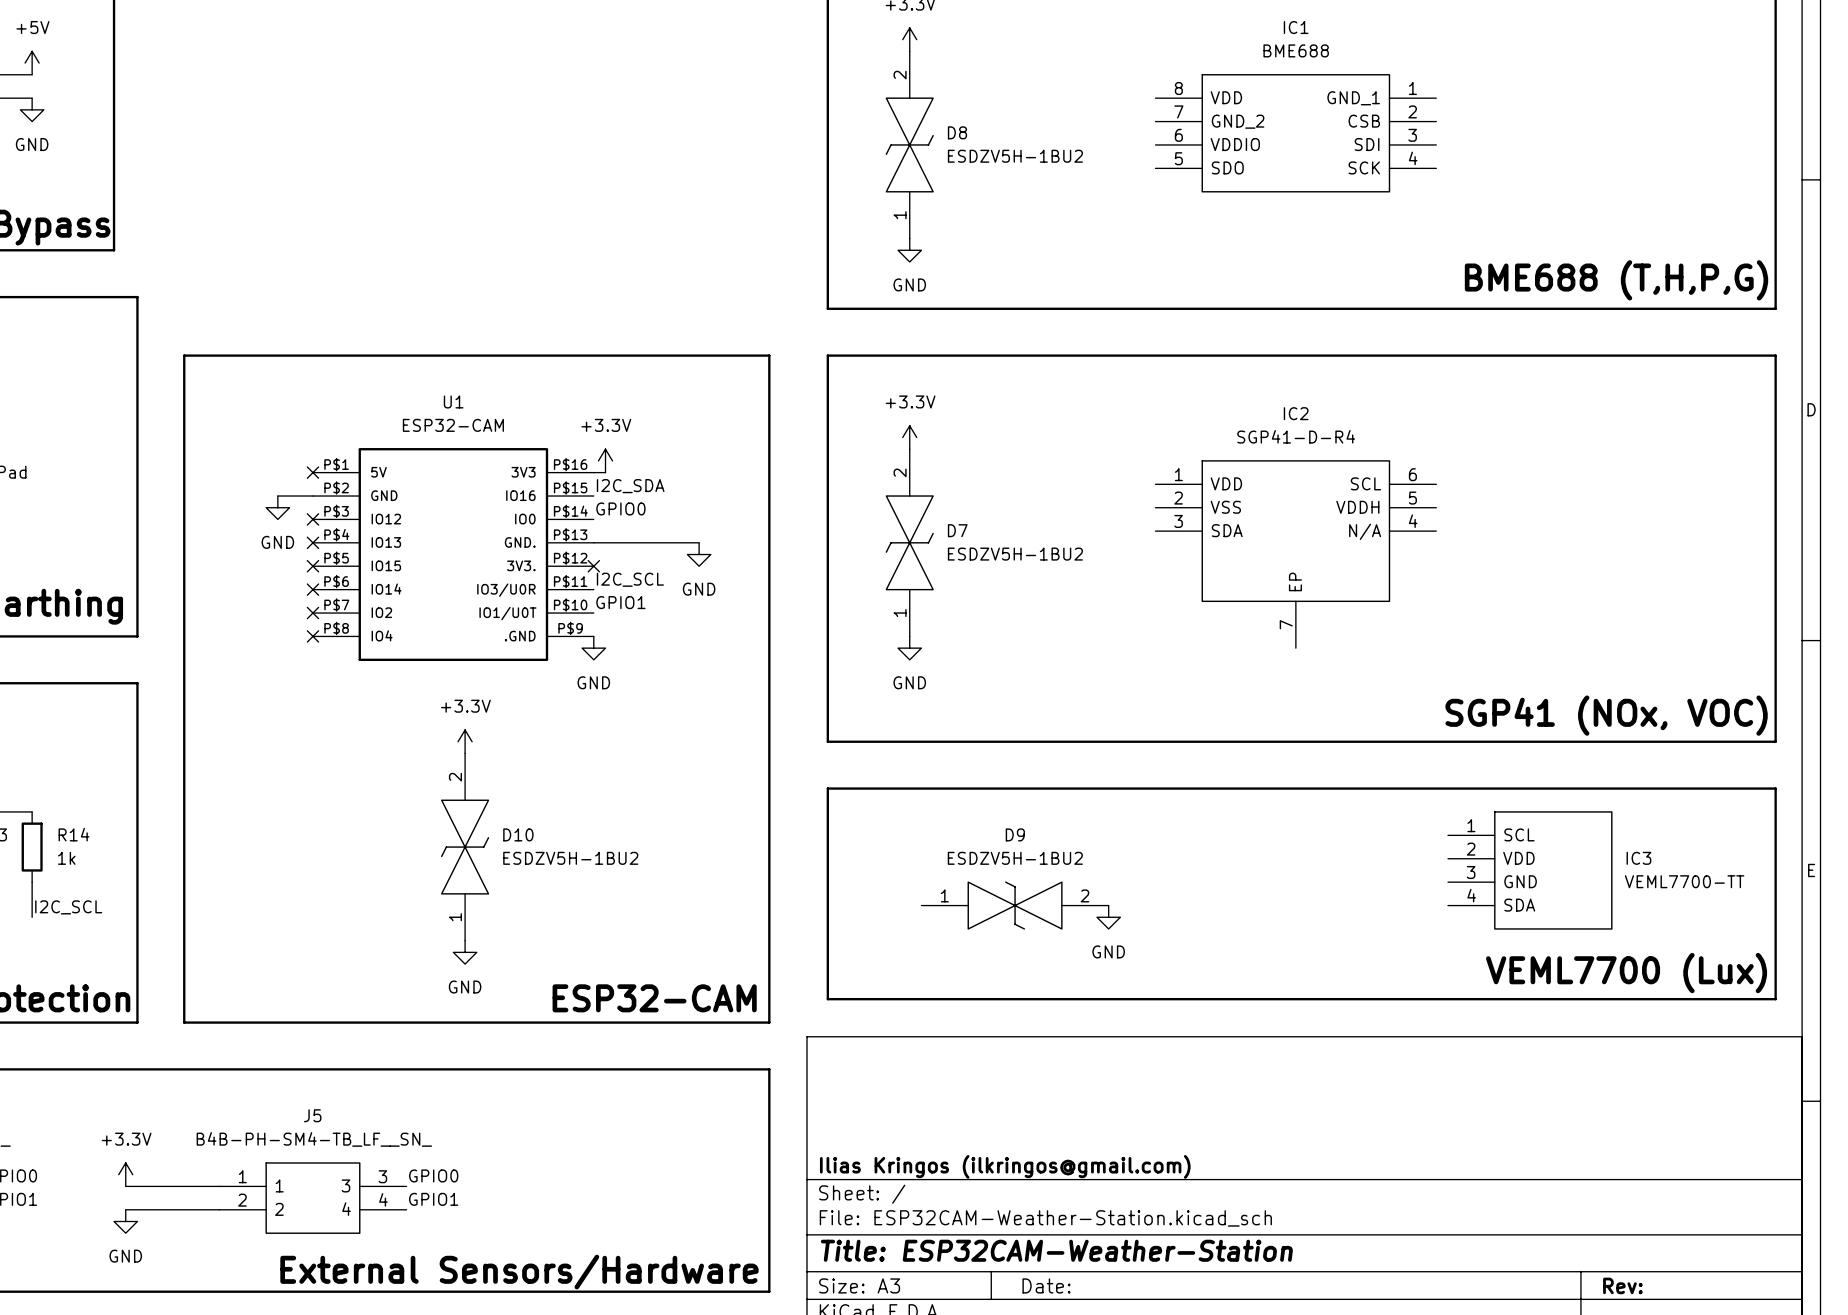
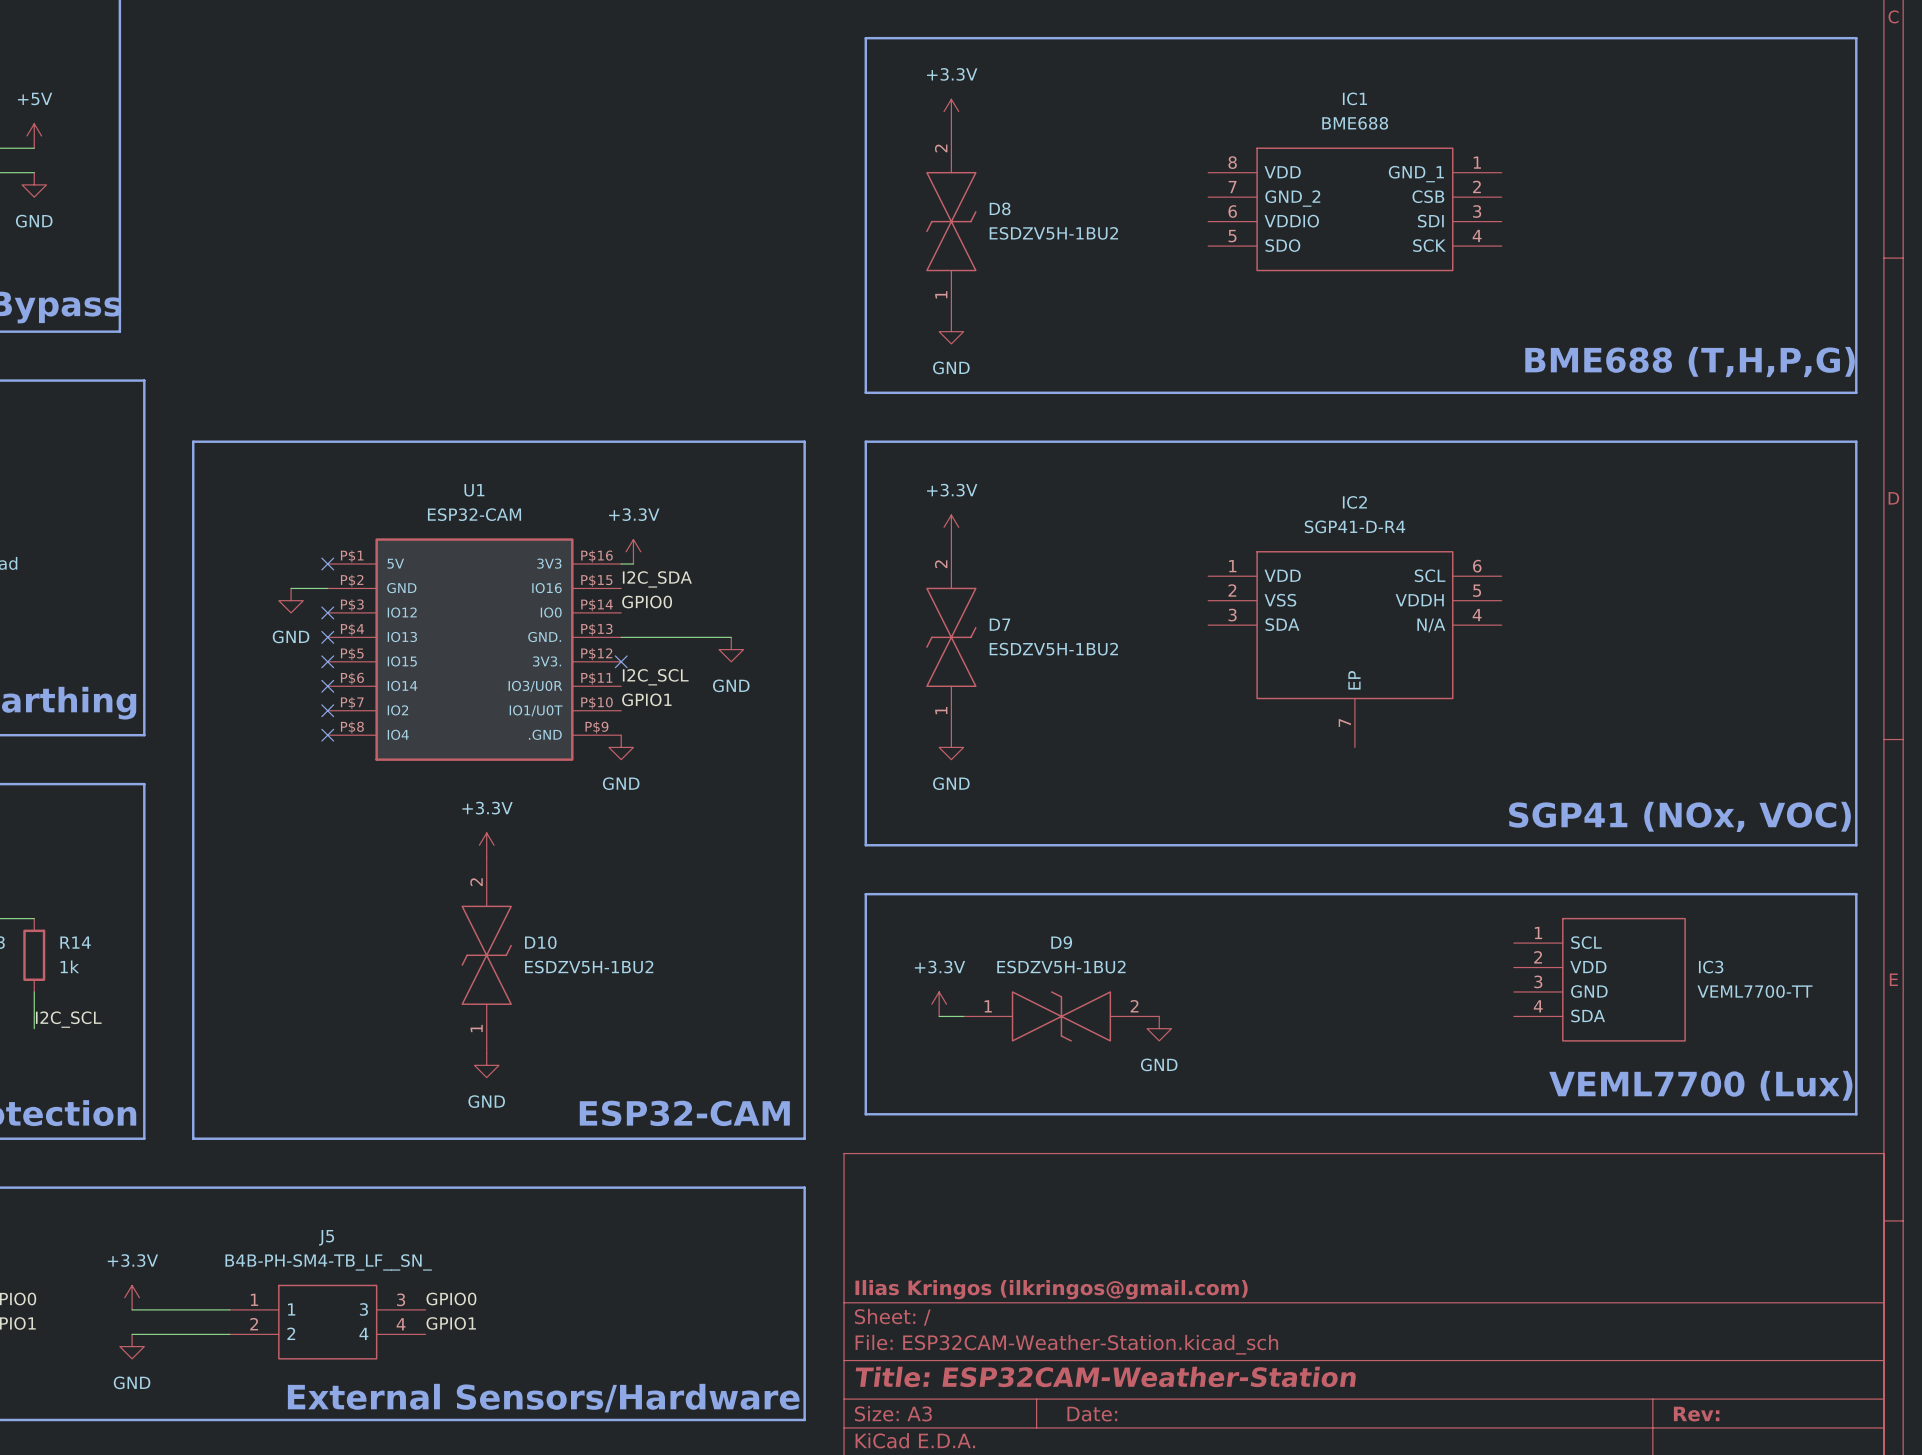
power symbol: none -> +3.3V (939, 1004)
wire: none -> (939, 1016) (963, 1016)

